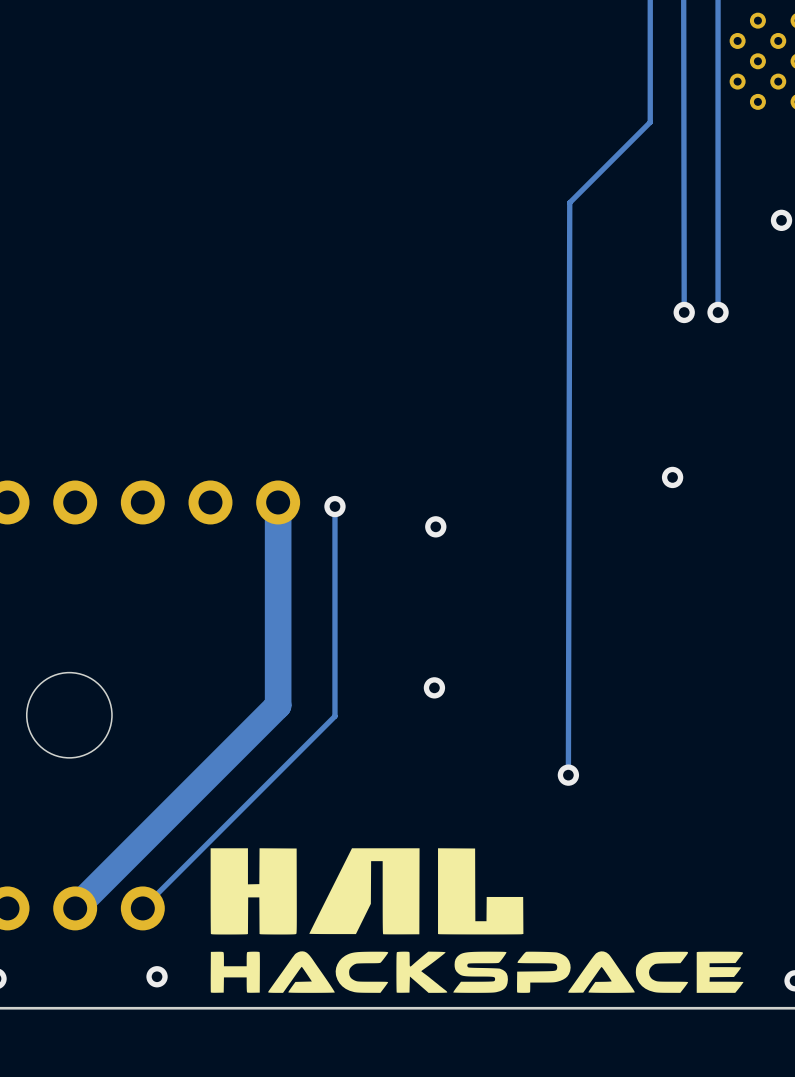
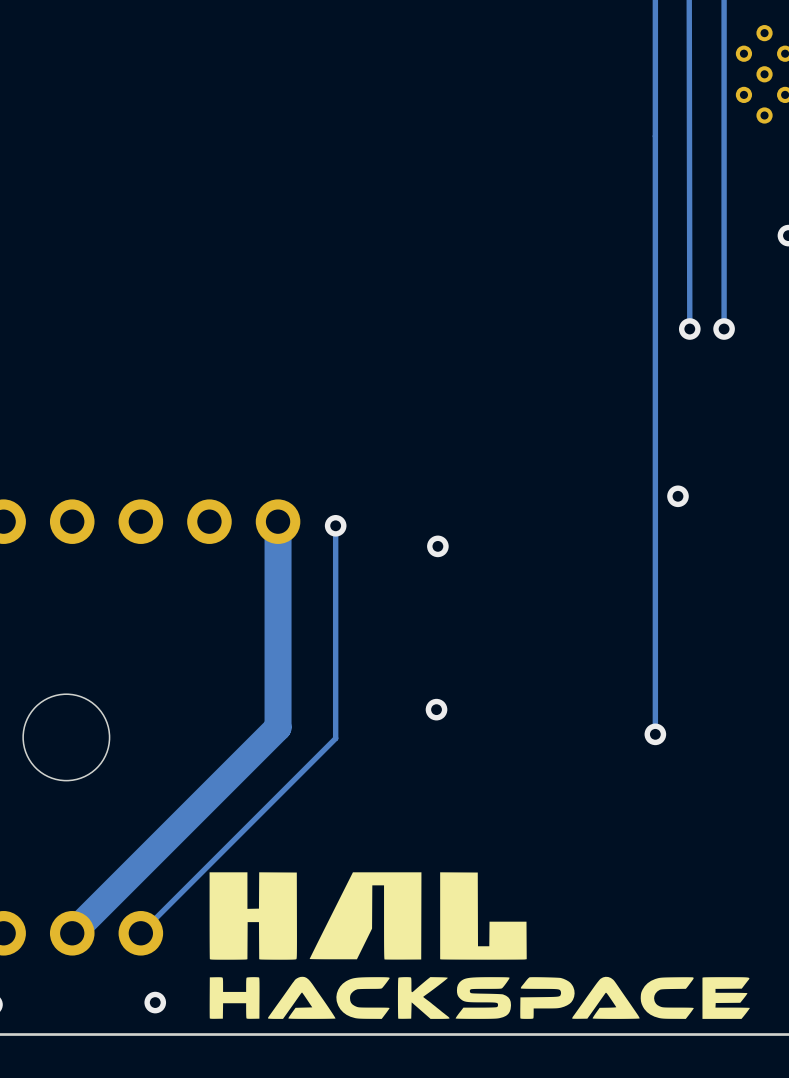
track: (650, 122) (569, 202) (568, 775) -> (655, 136) (655, 734)
via position: (568, 775) -> (655, 734)

